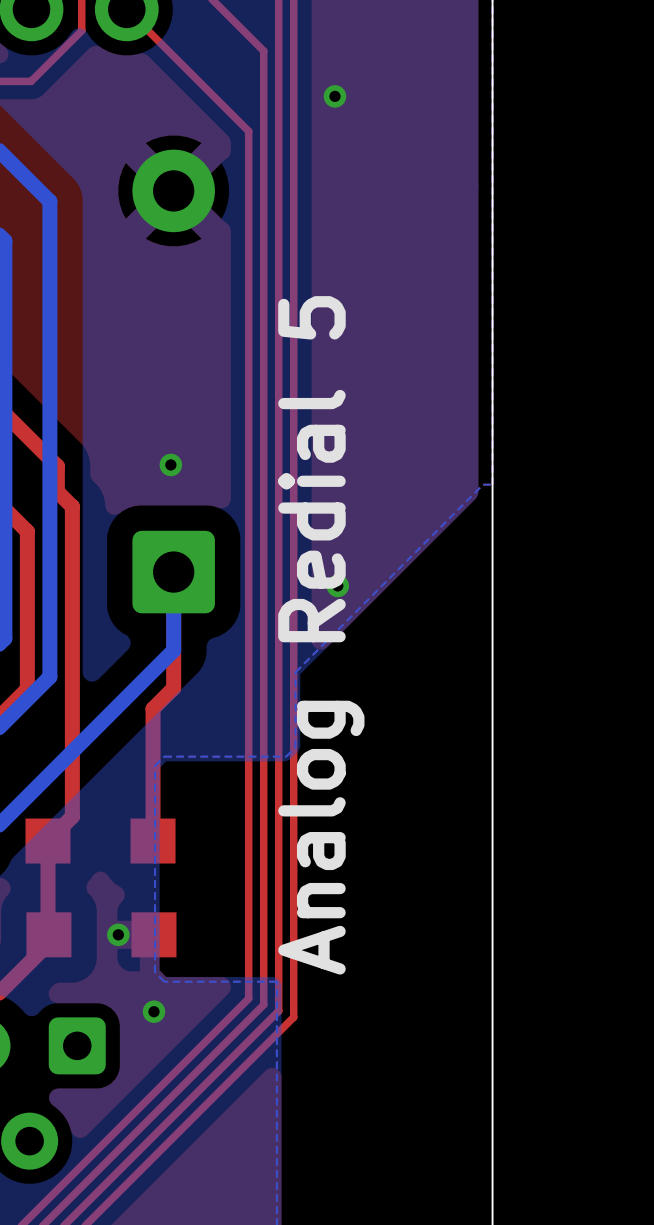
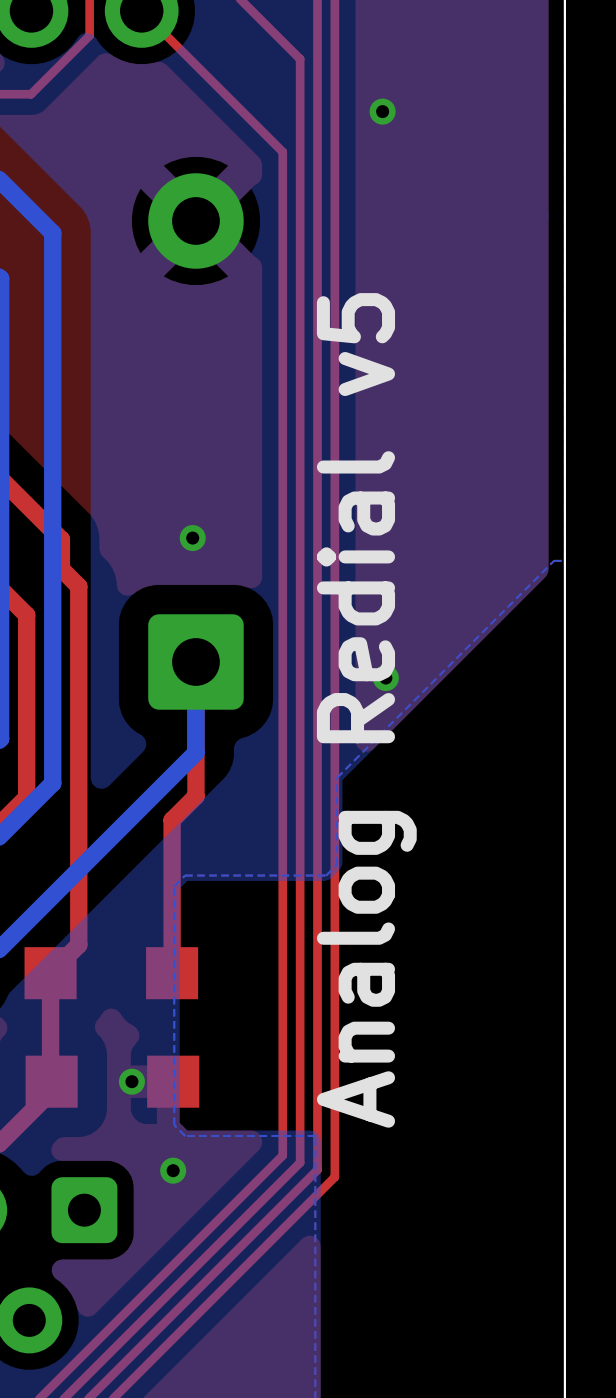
text: Analog Redial 5 (321, 635) -> Analog Redial v5 (366, 710)

